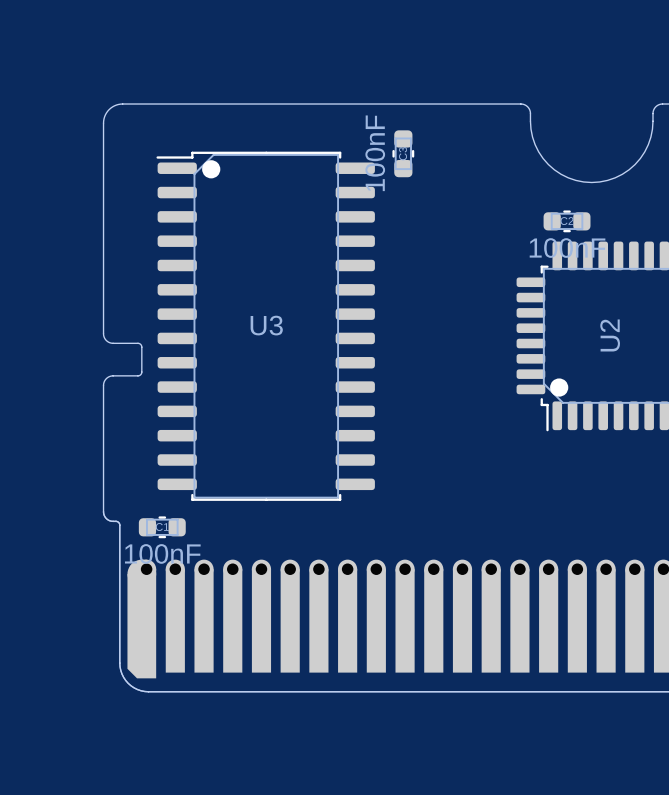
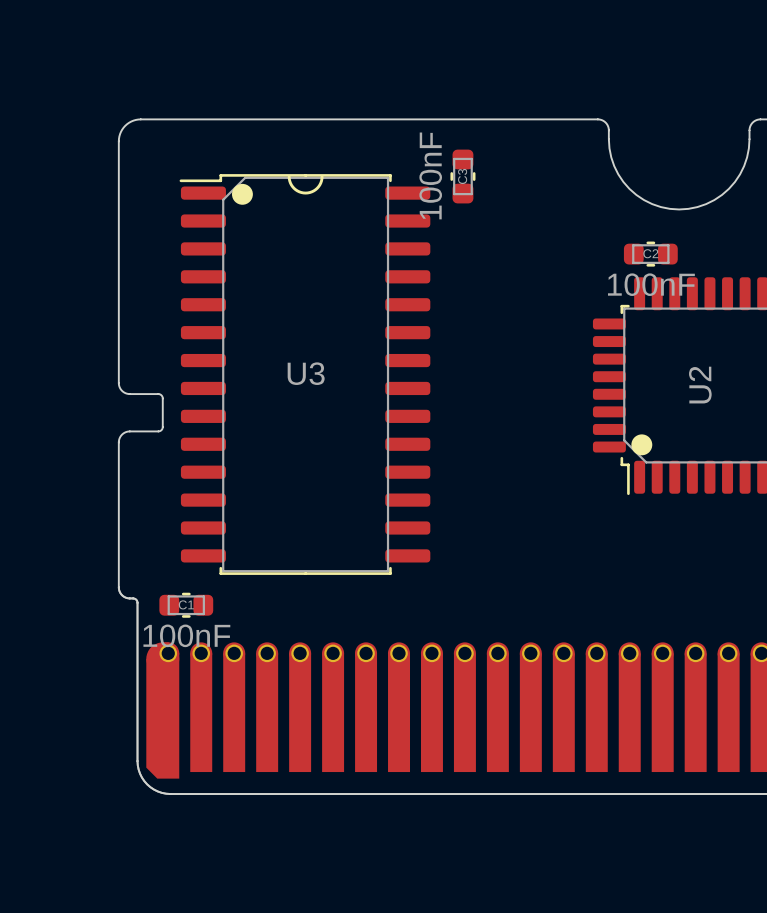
line: none -> (289, 176) (294, 188) (305, 193) (317, 188) (322, 176)

